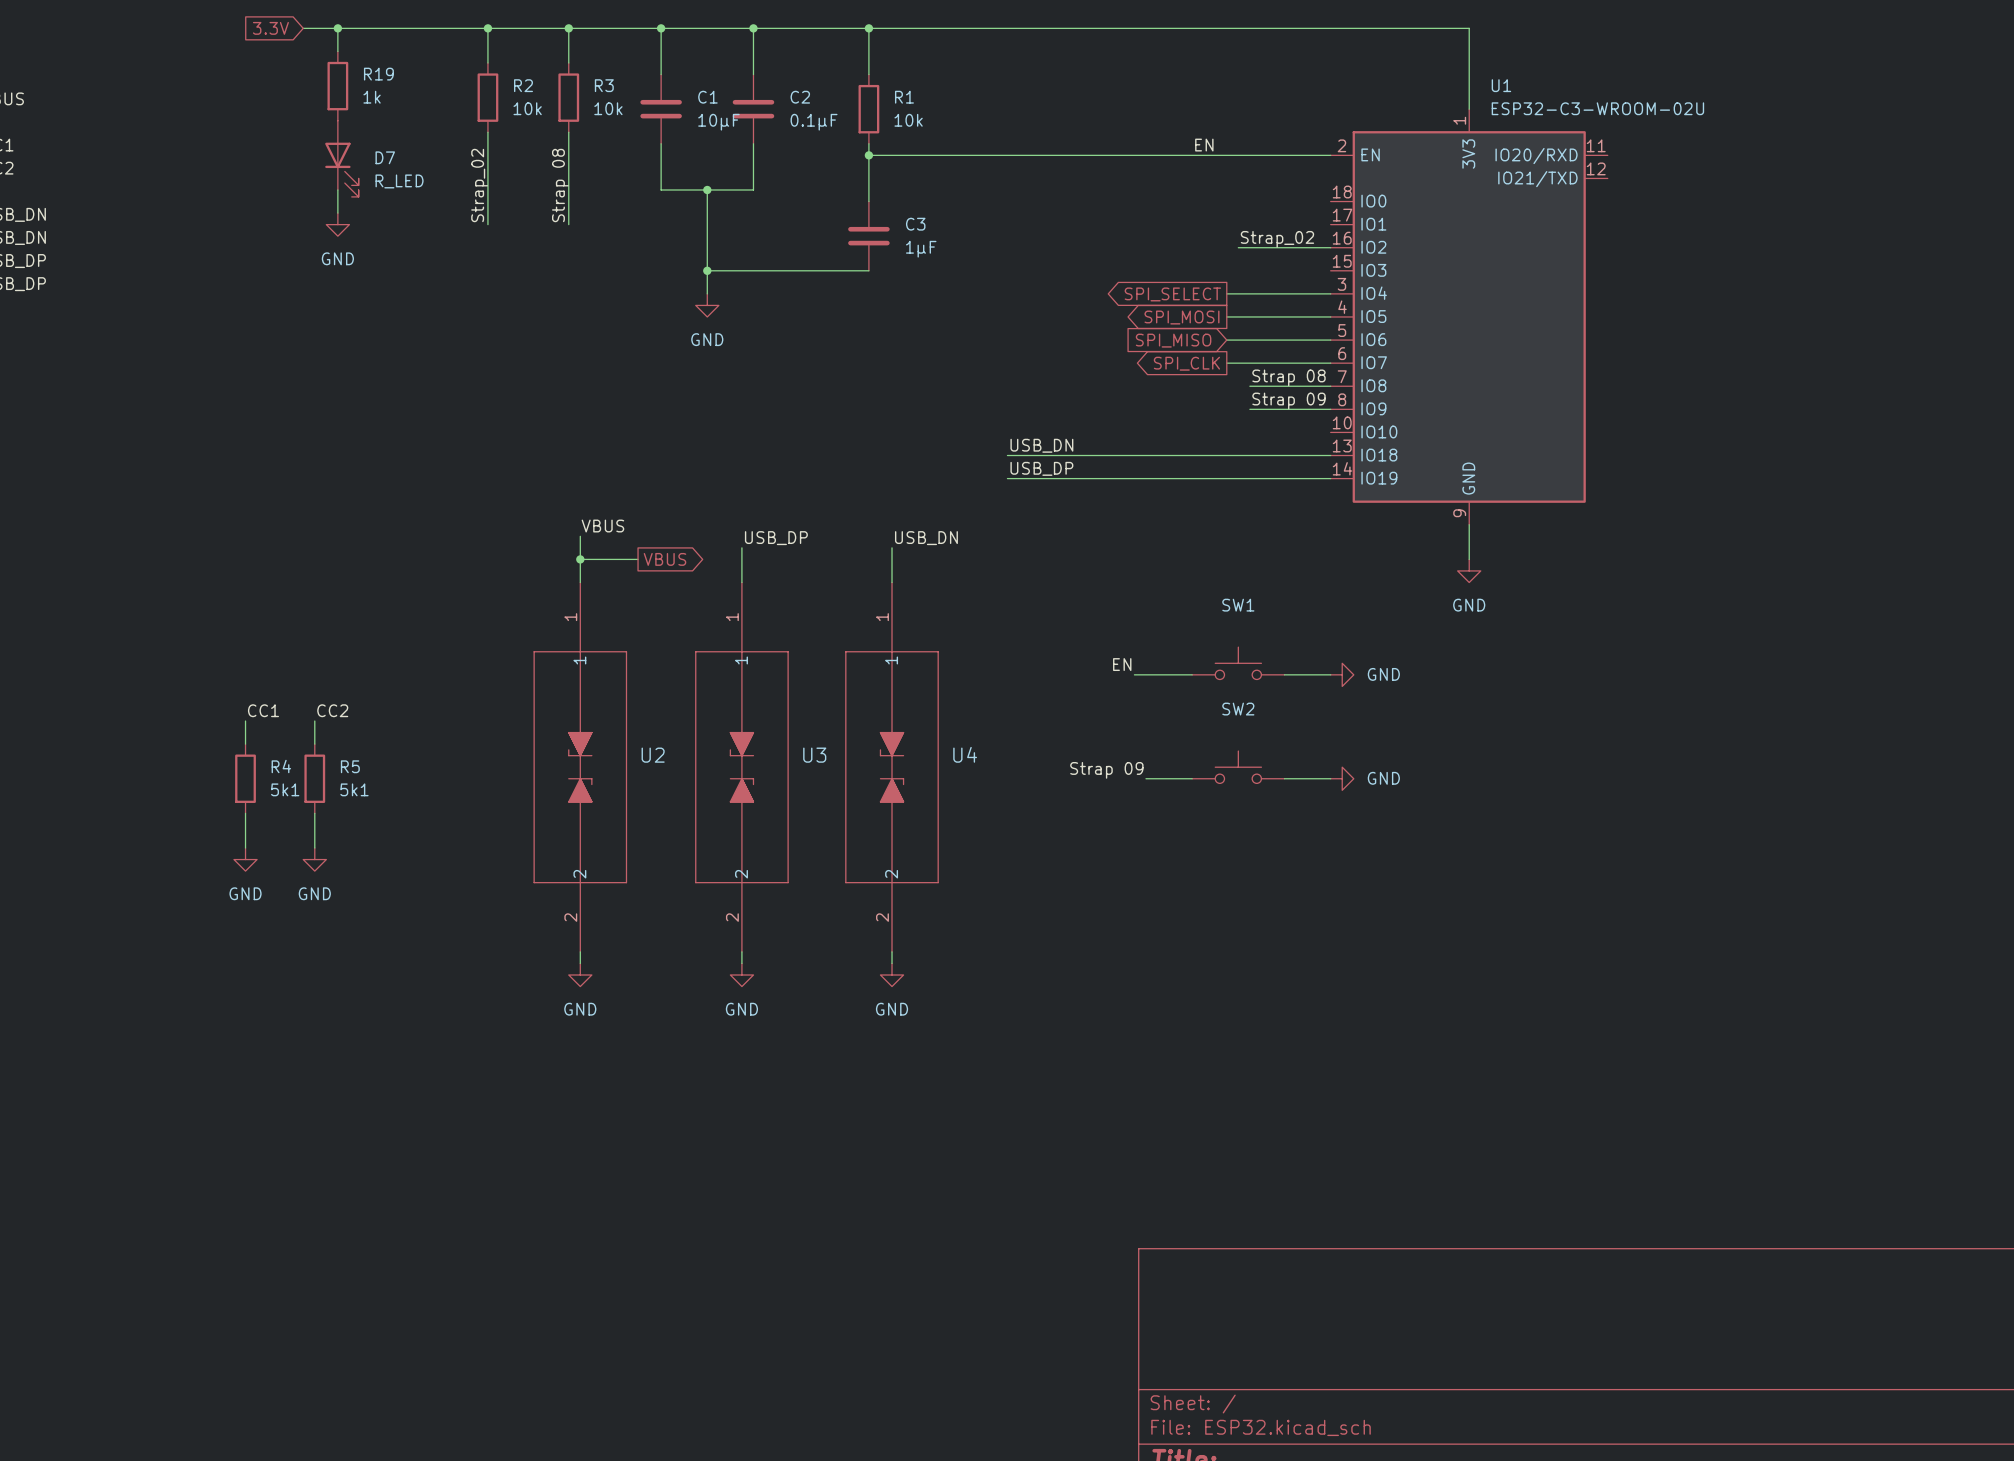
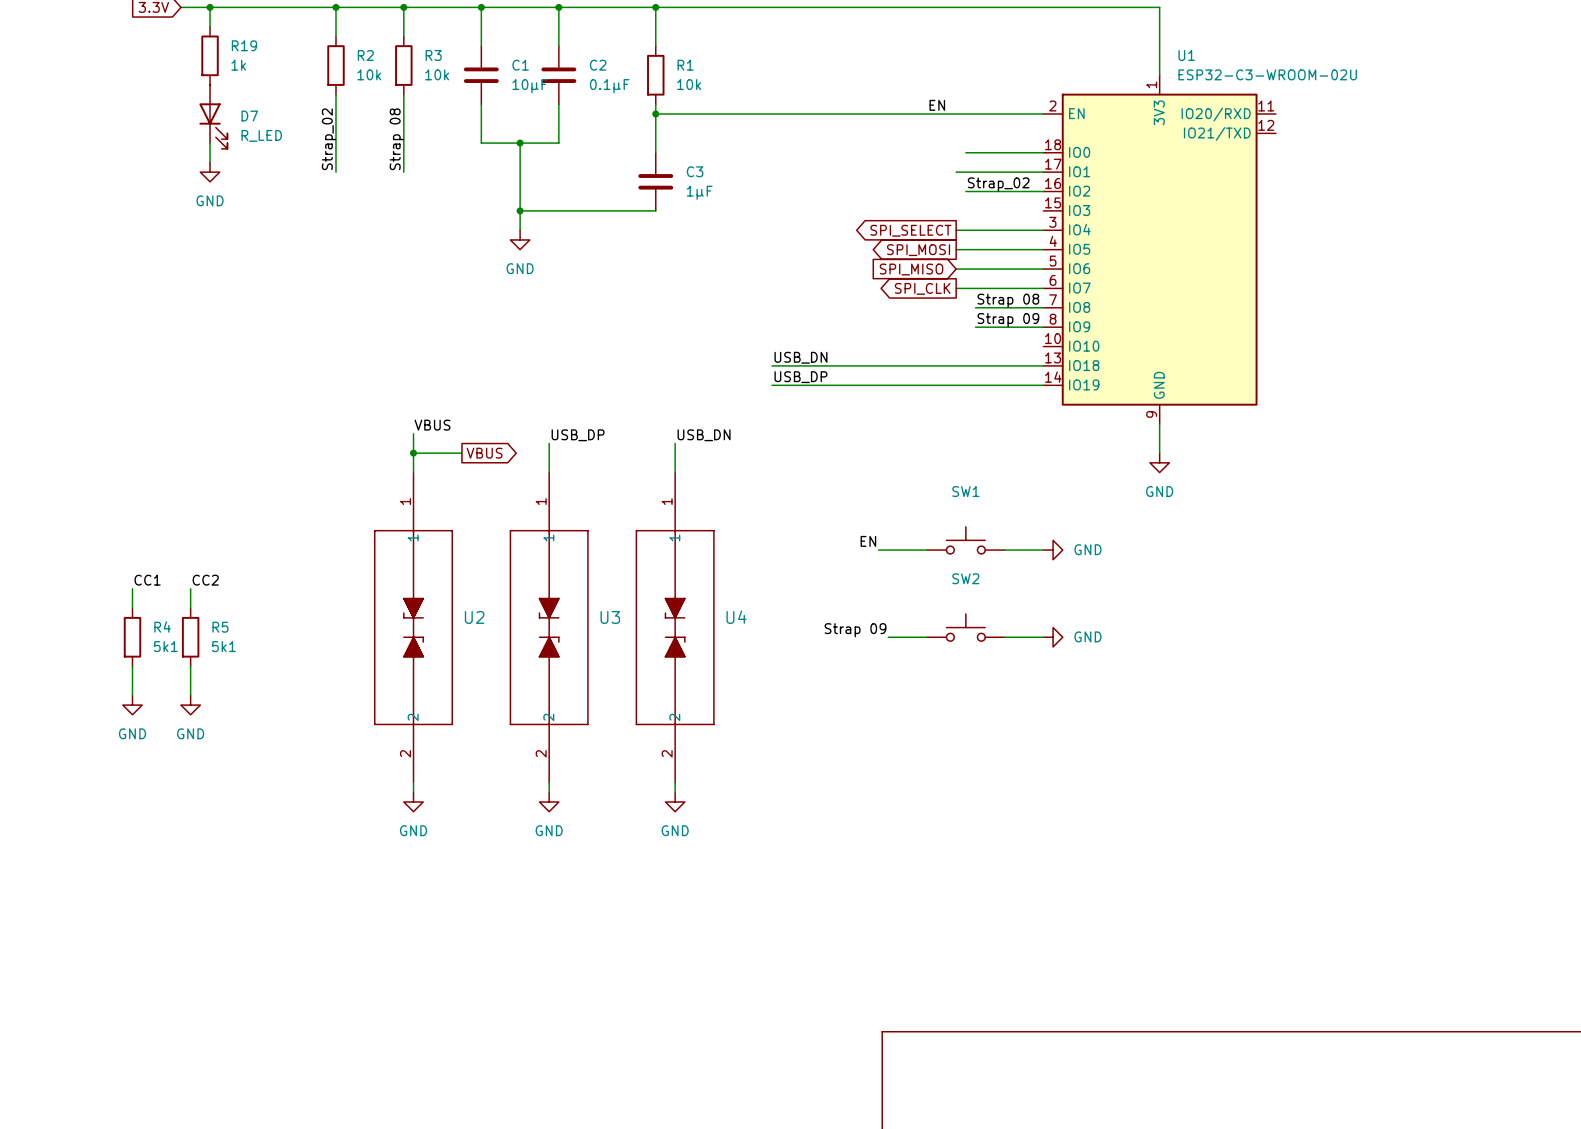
wire: none -> (965, 152) (1043, 152)
wire: none -> (956, 172) (1043, 172)

